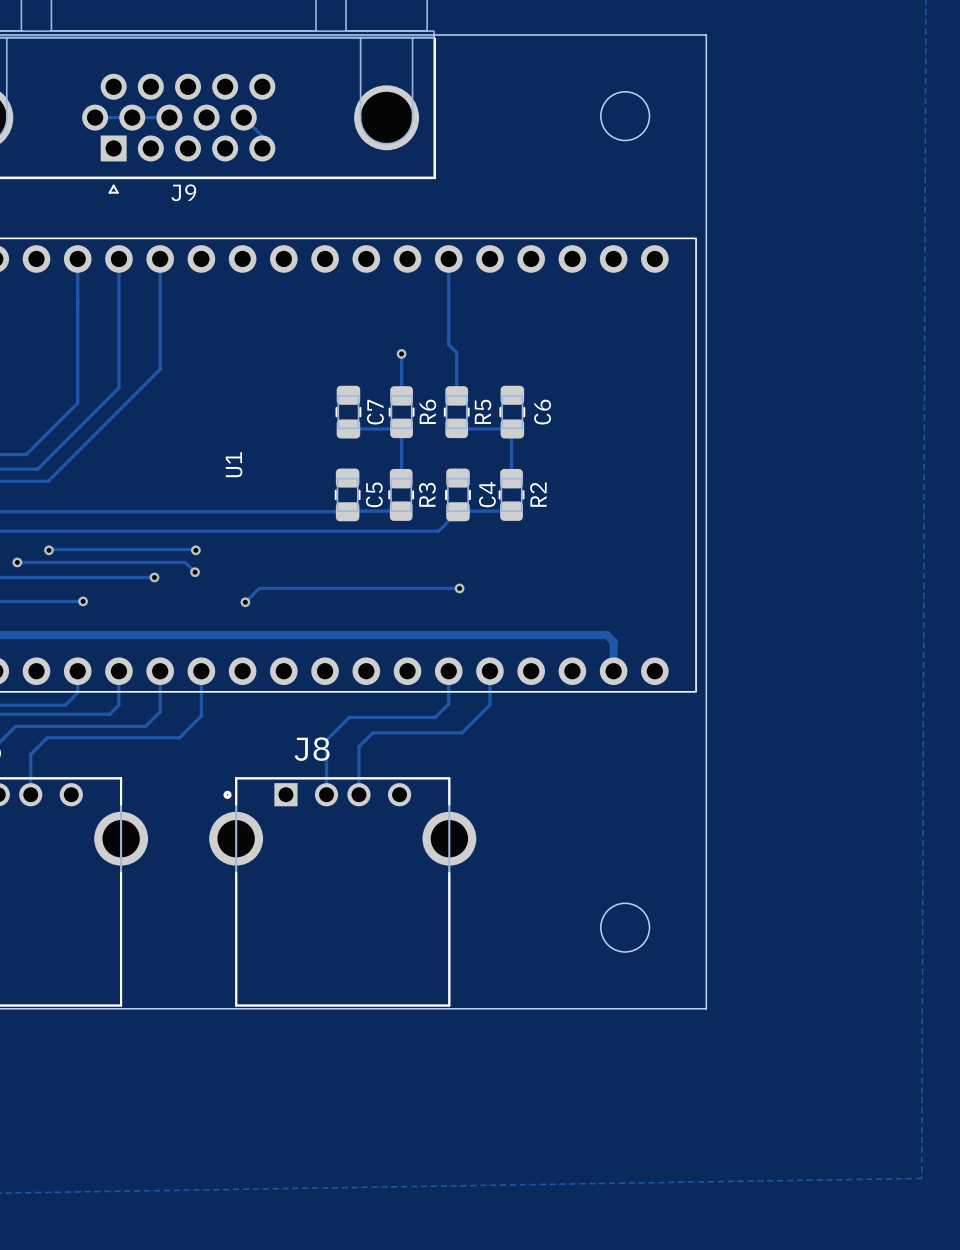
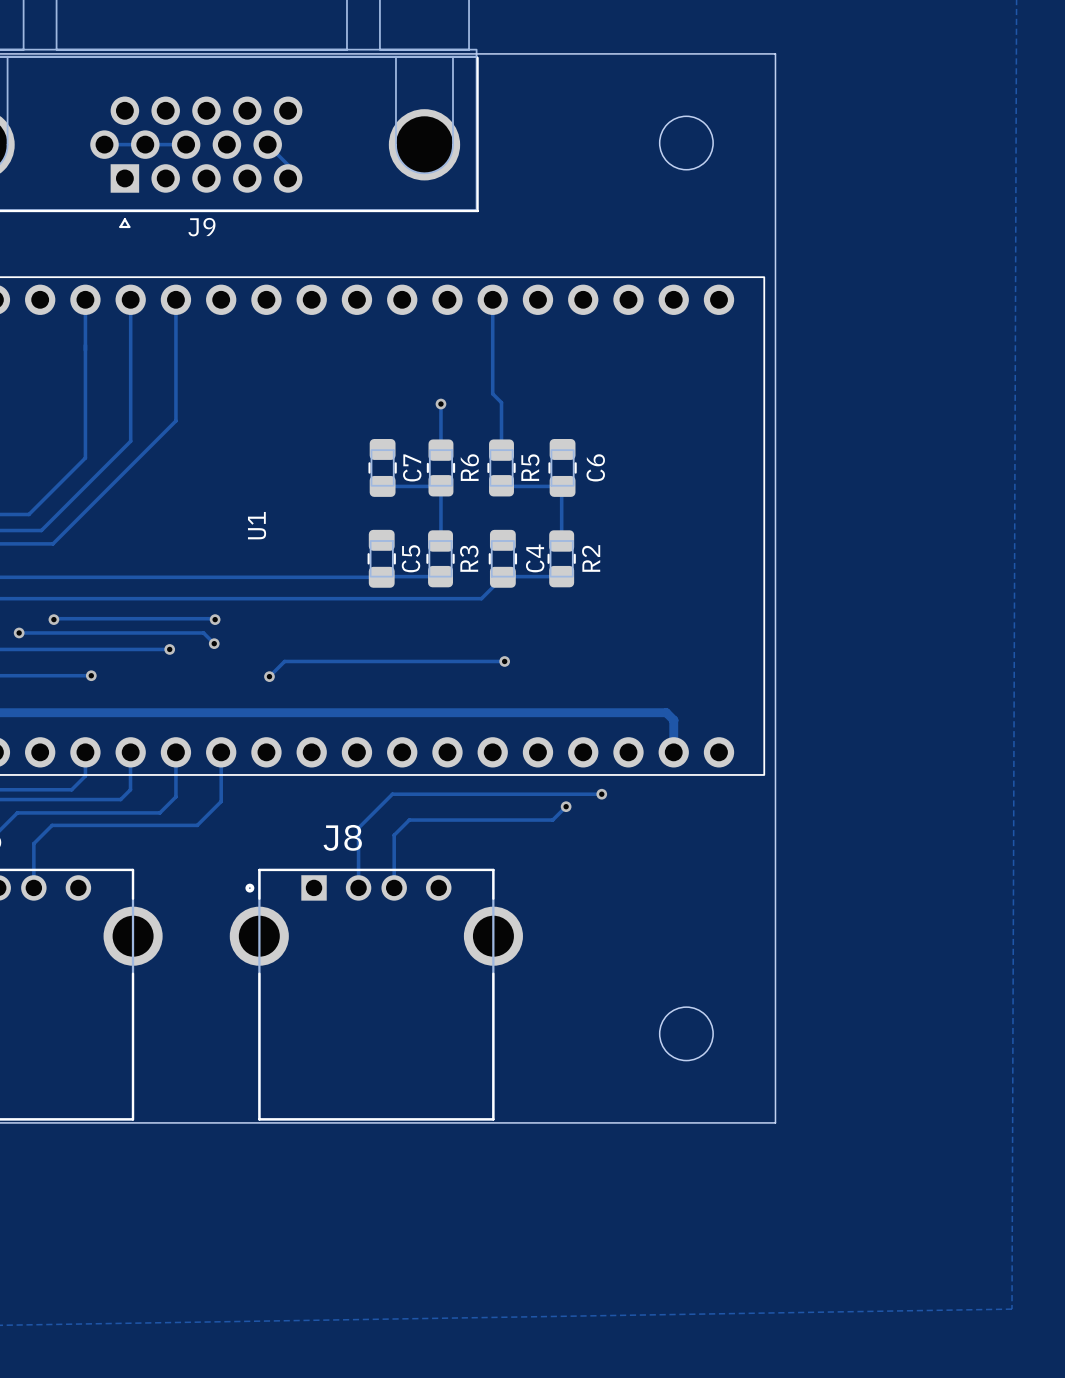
track: (448, 671) (448, 703) (435, 717) (349, 717) -> (601, 794) (392, 794) (383, 803)
track: (489, 671) (489, 704) (462, 732) -> (566, 806) (552, 820) (507, 820)
via: none -> (601, 794)
via: none -> (566, 806)

